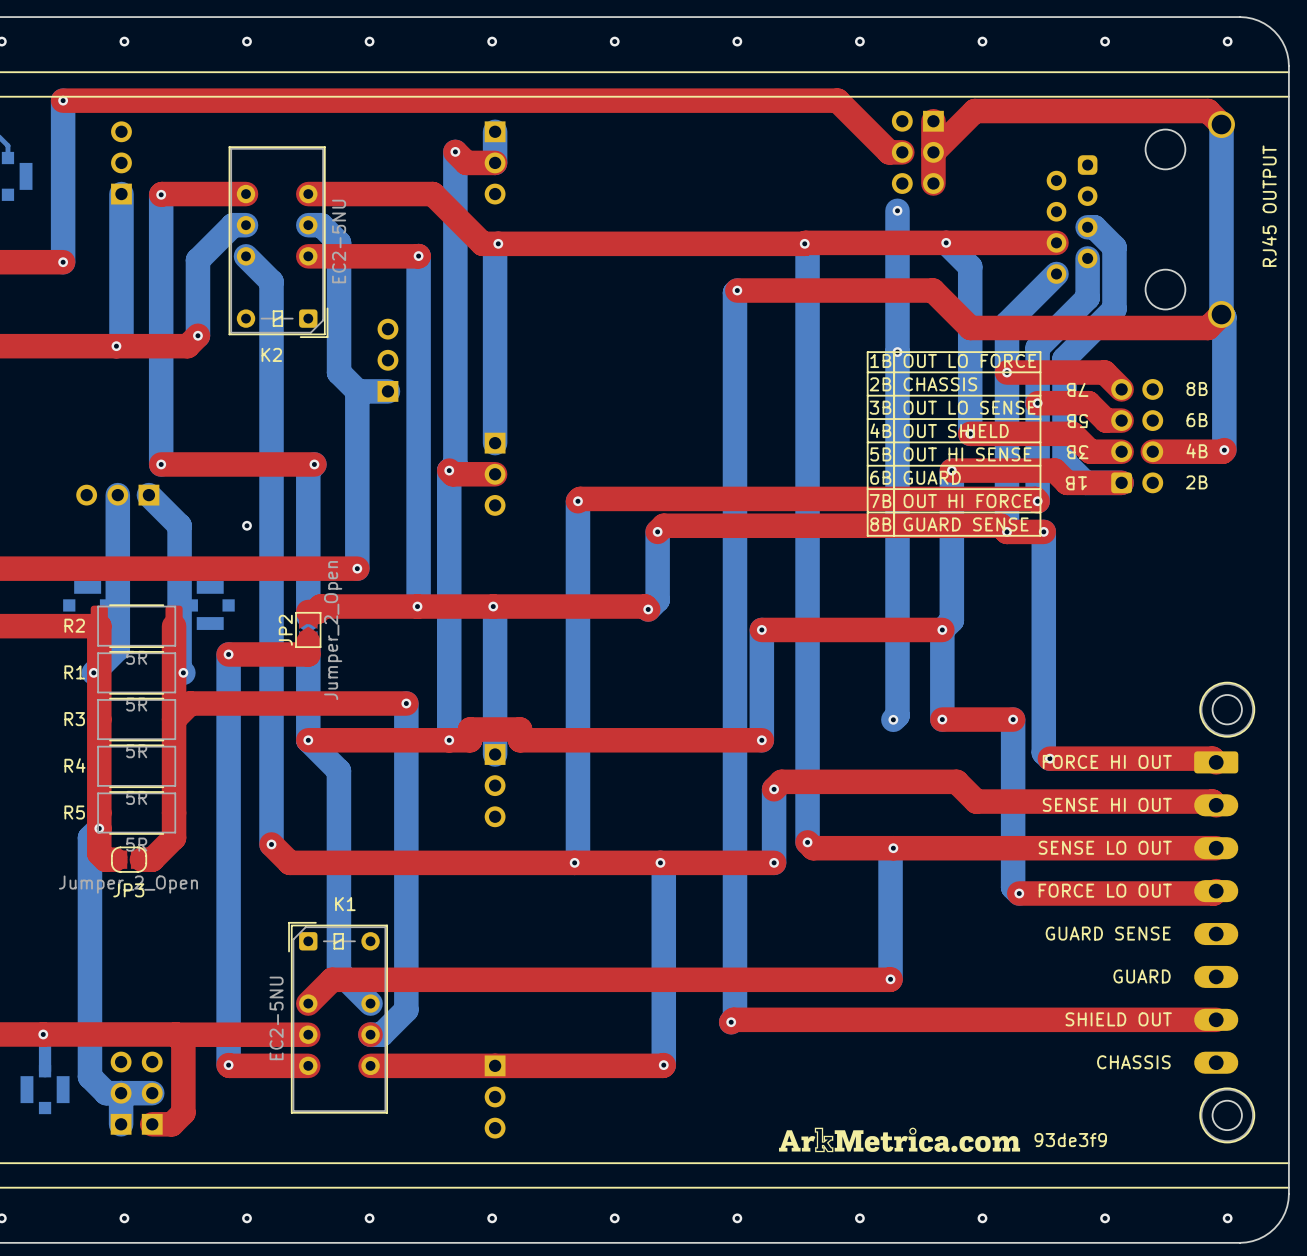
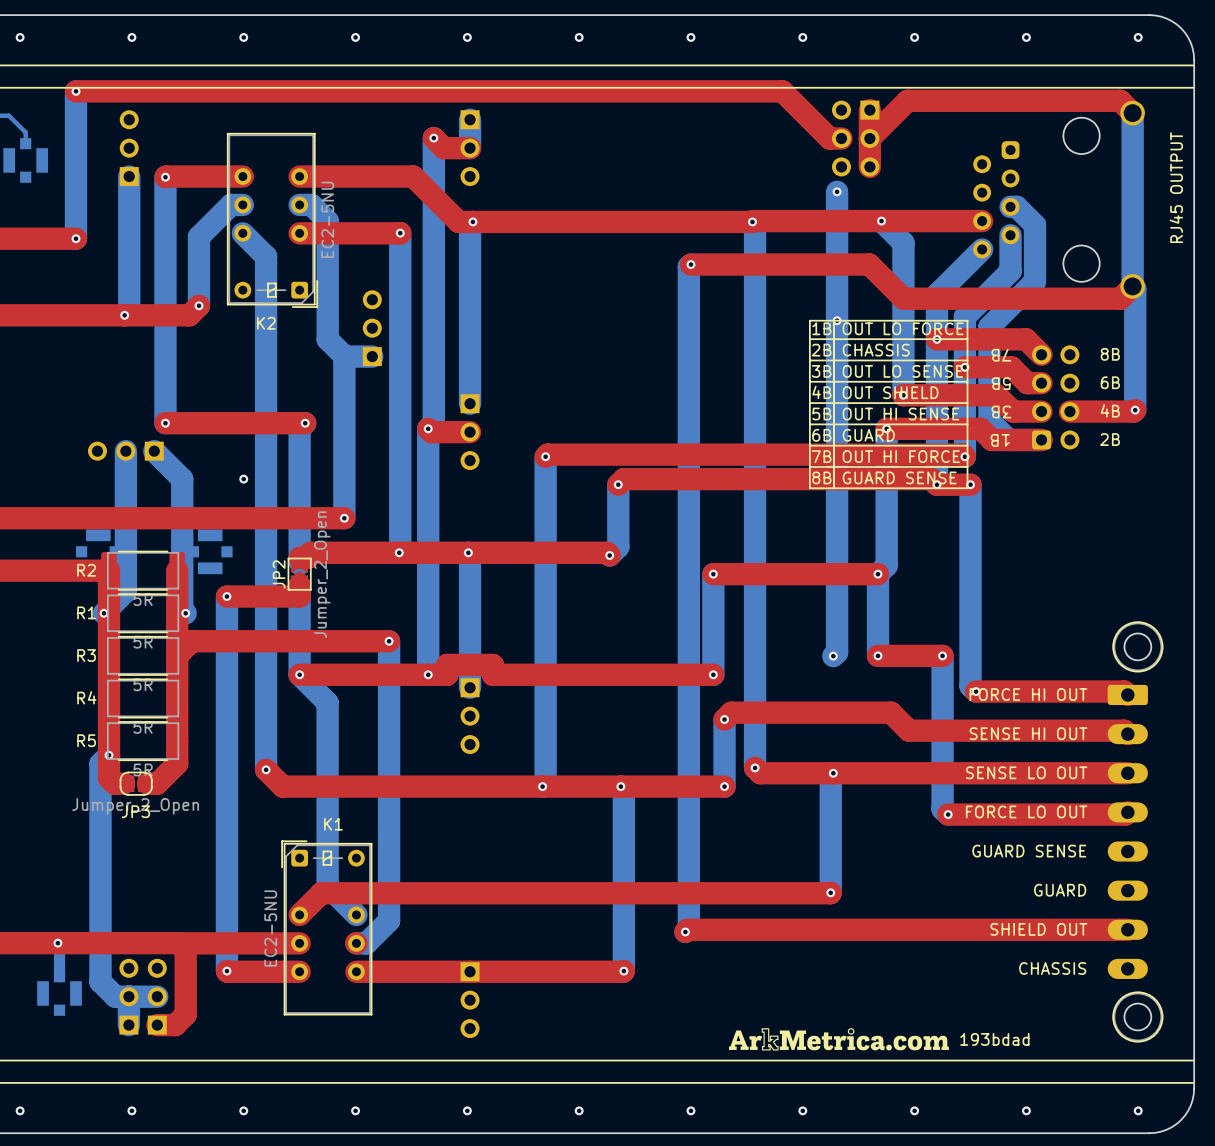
text: 93de3f9 (1070, 1140) -> 193bdad (994, 1039)

